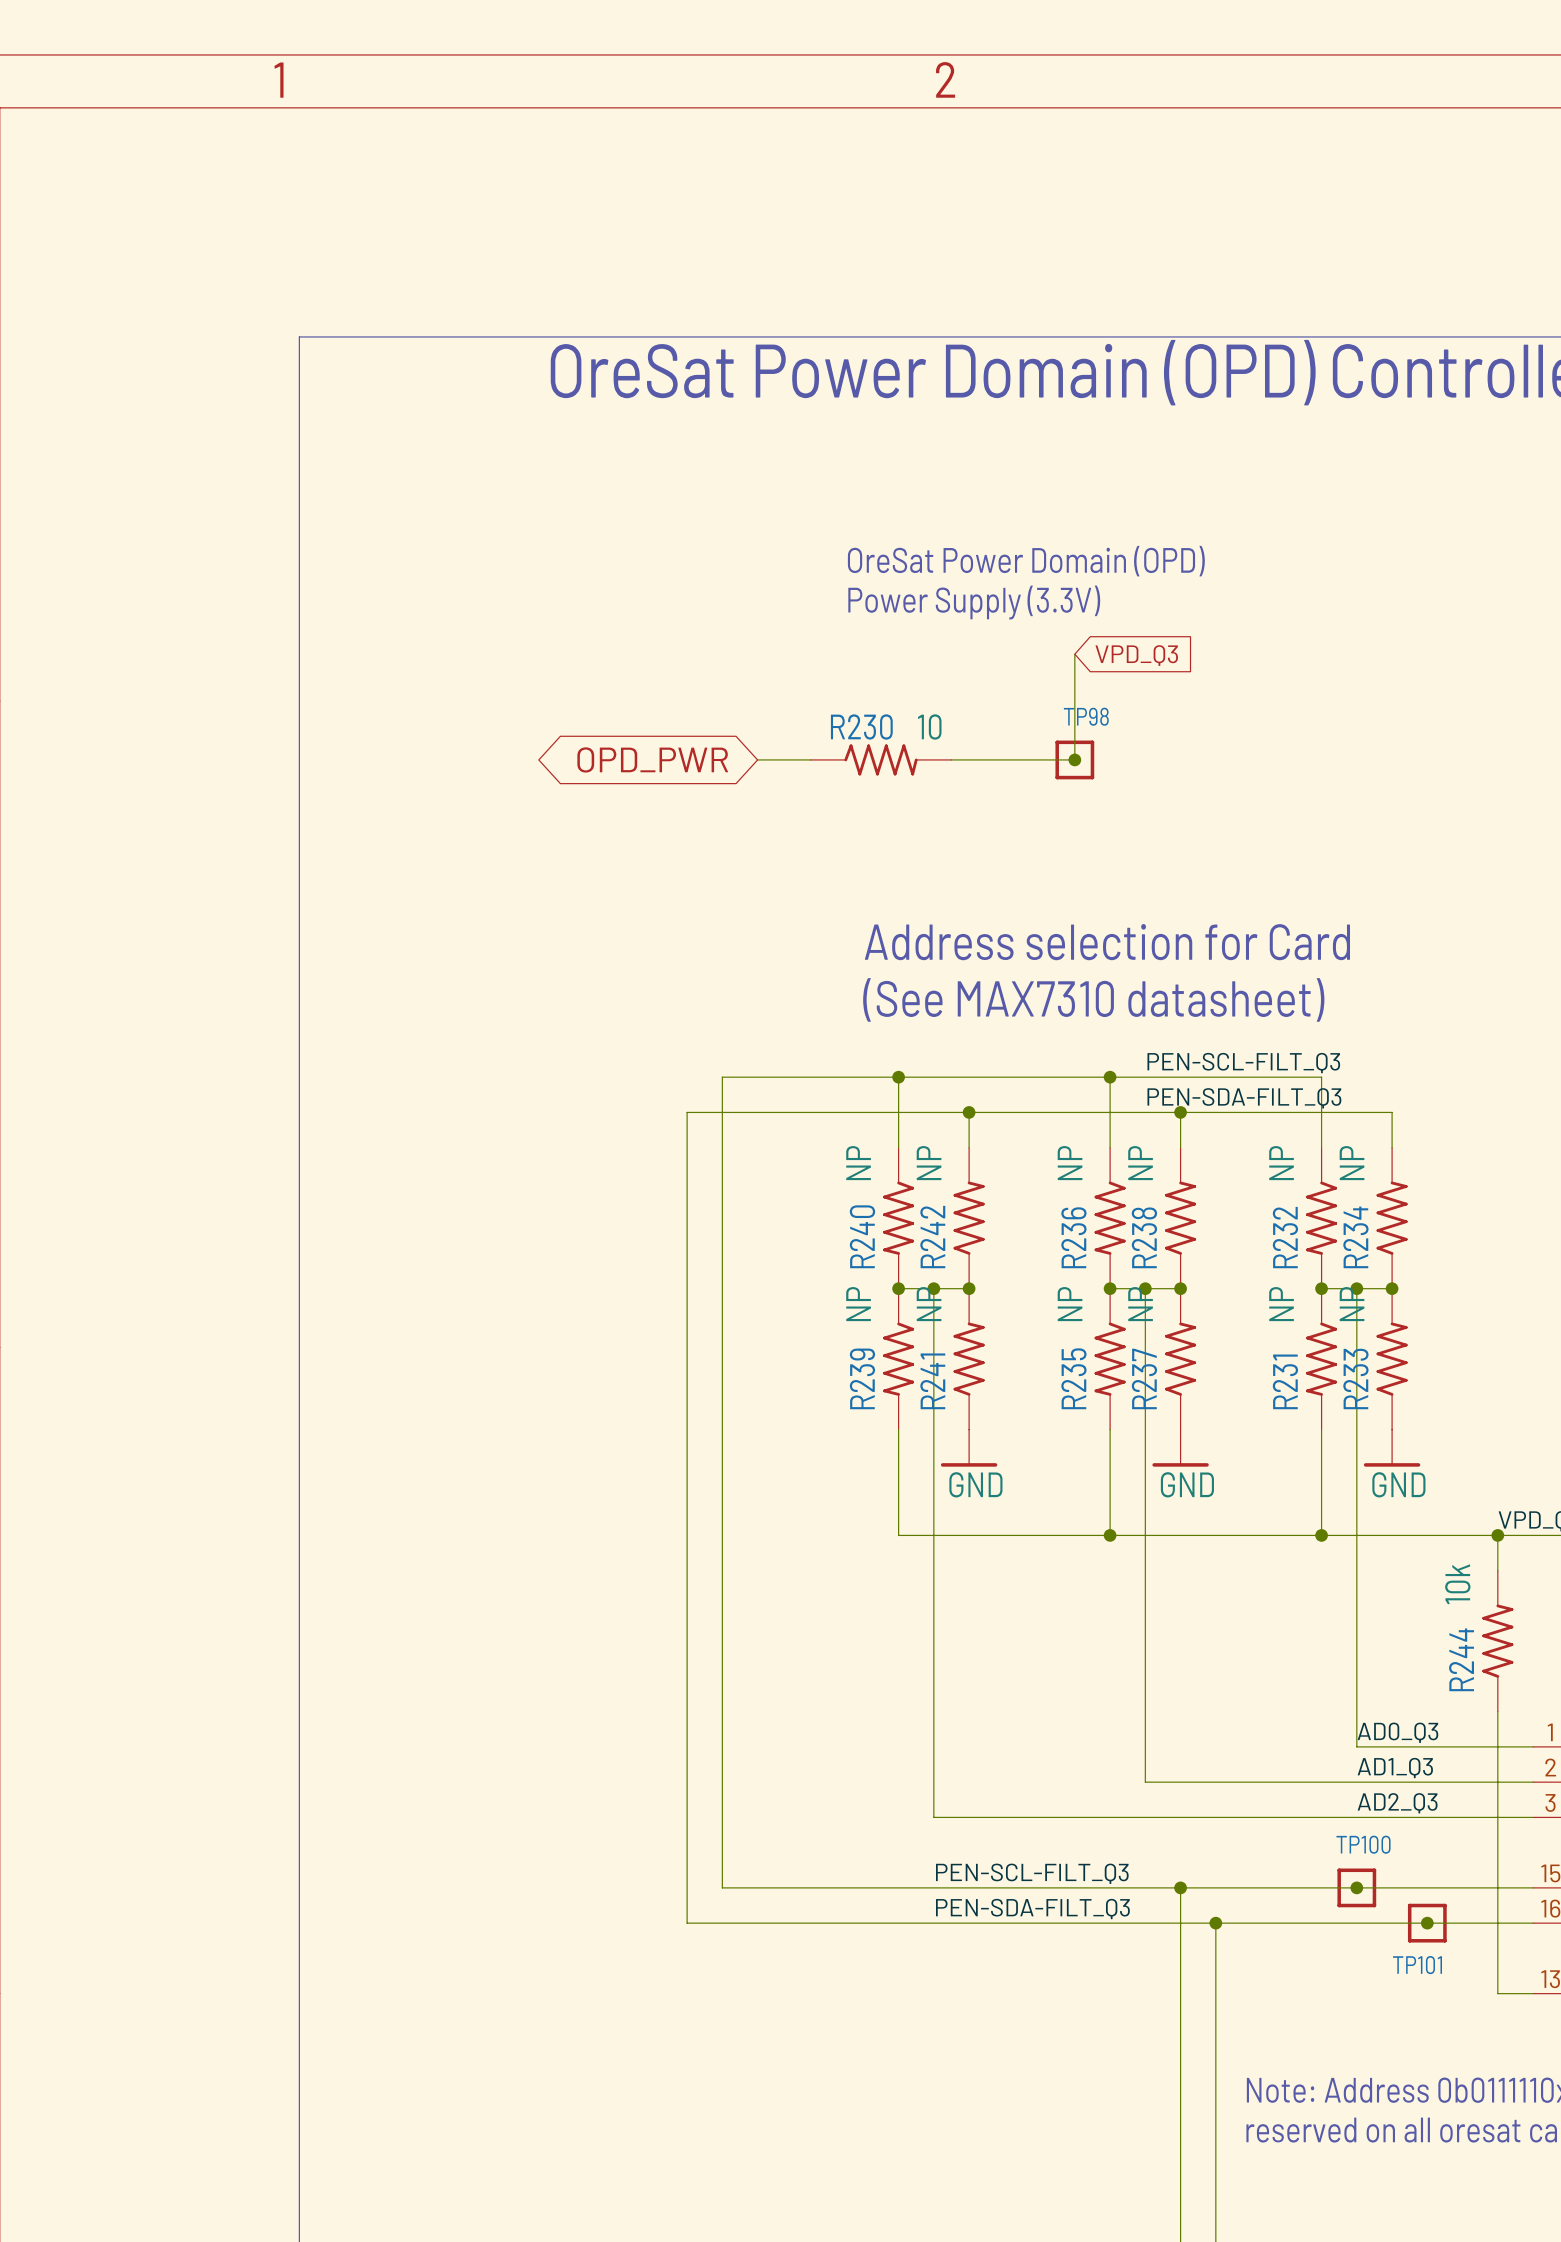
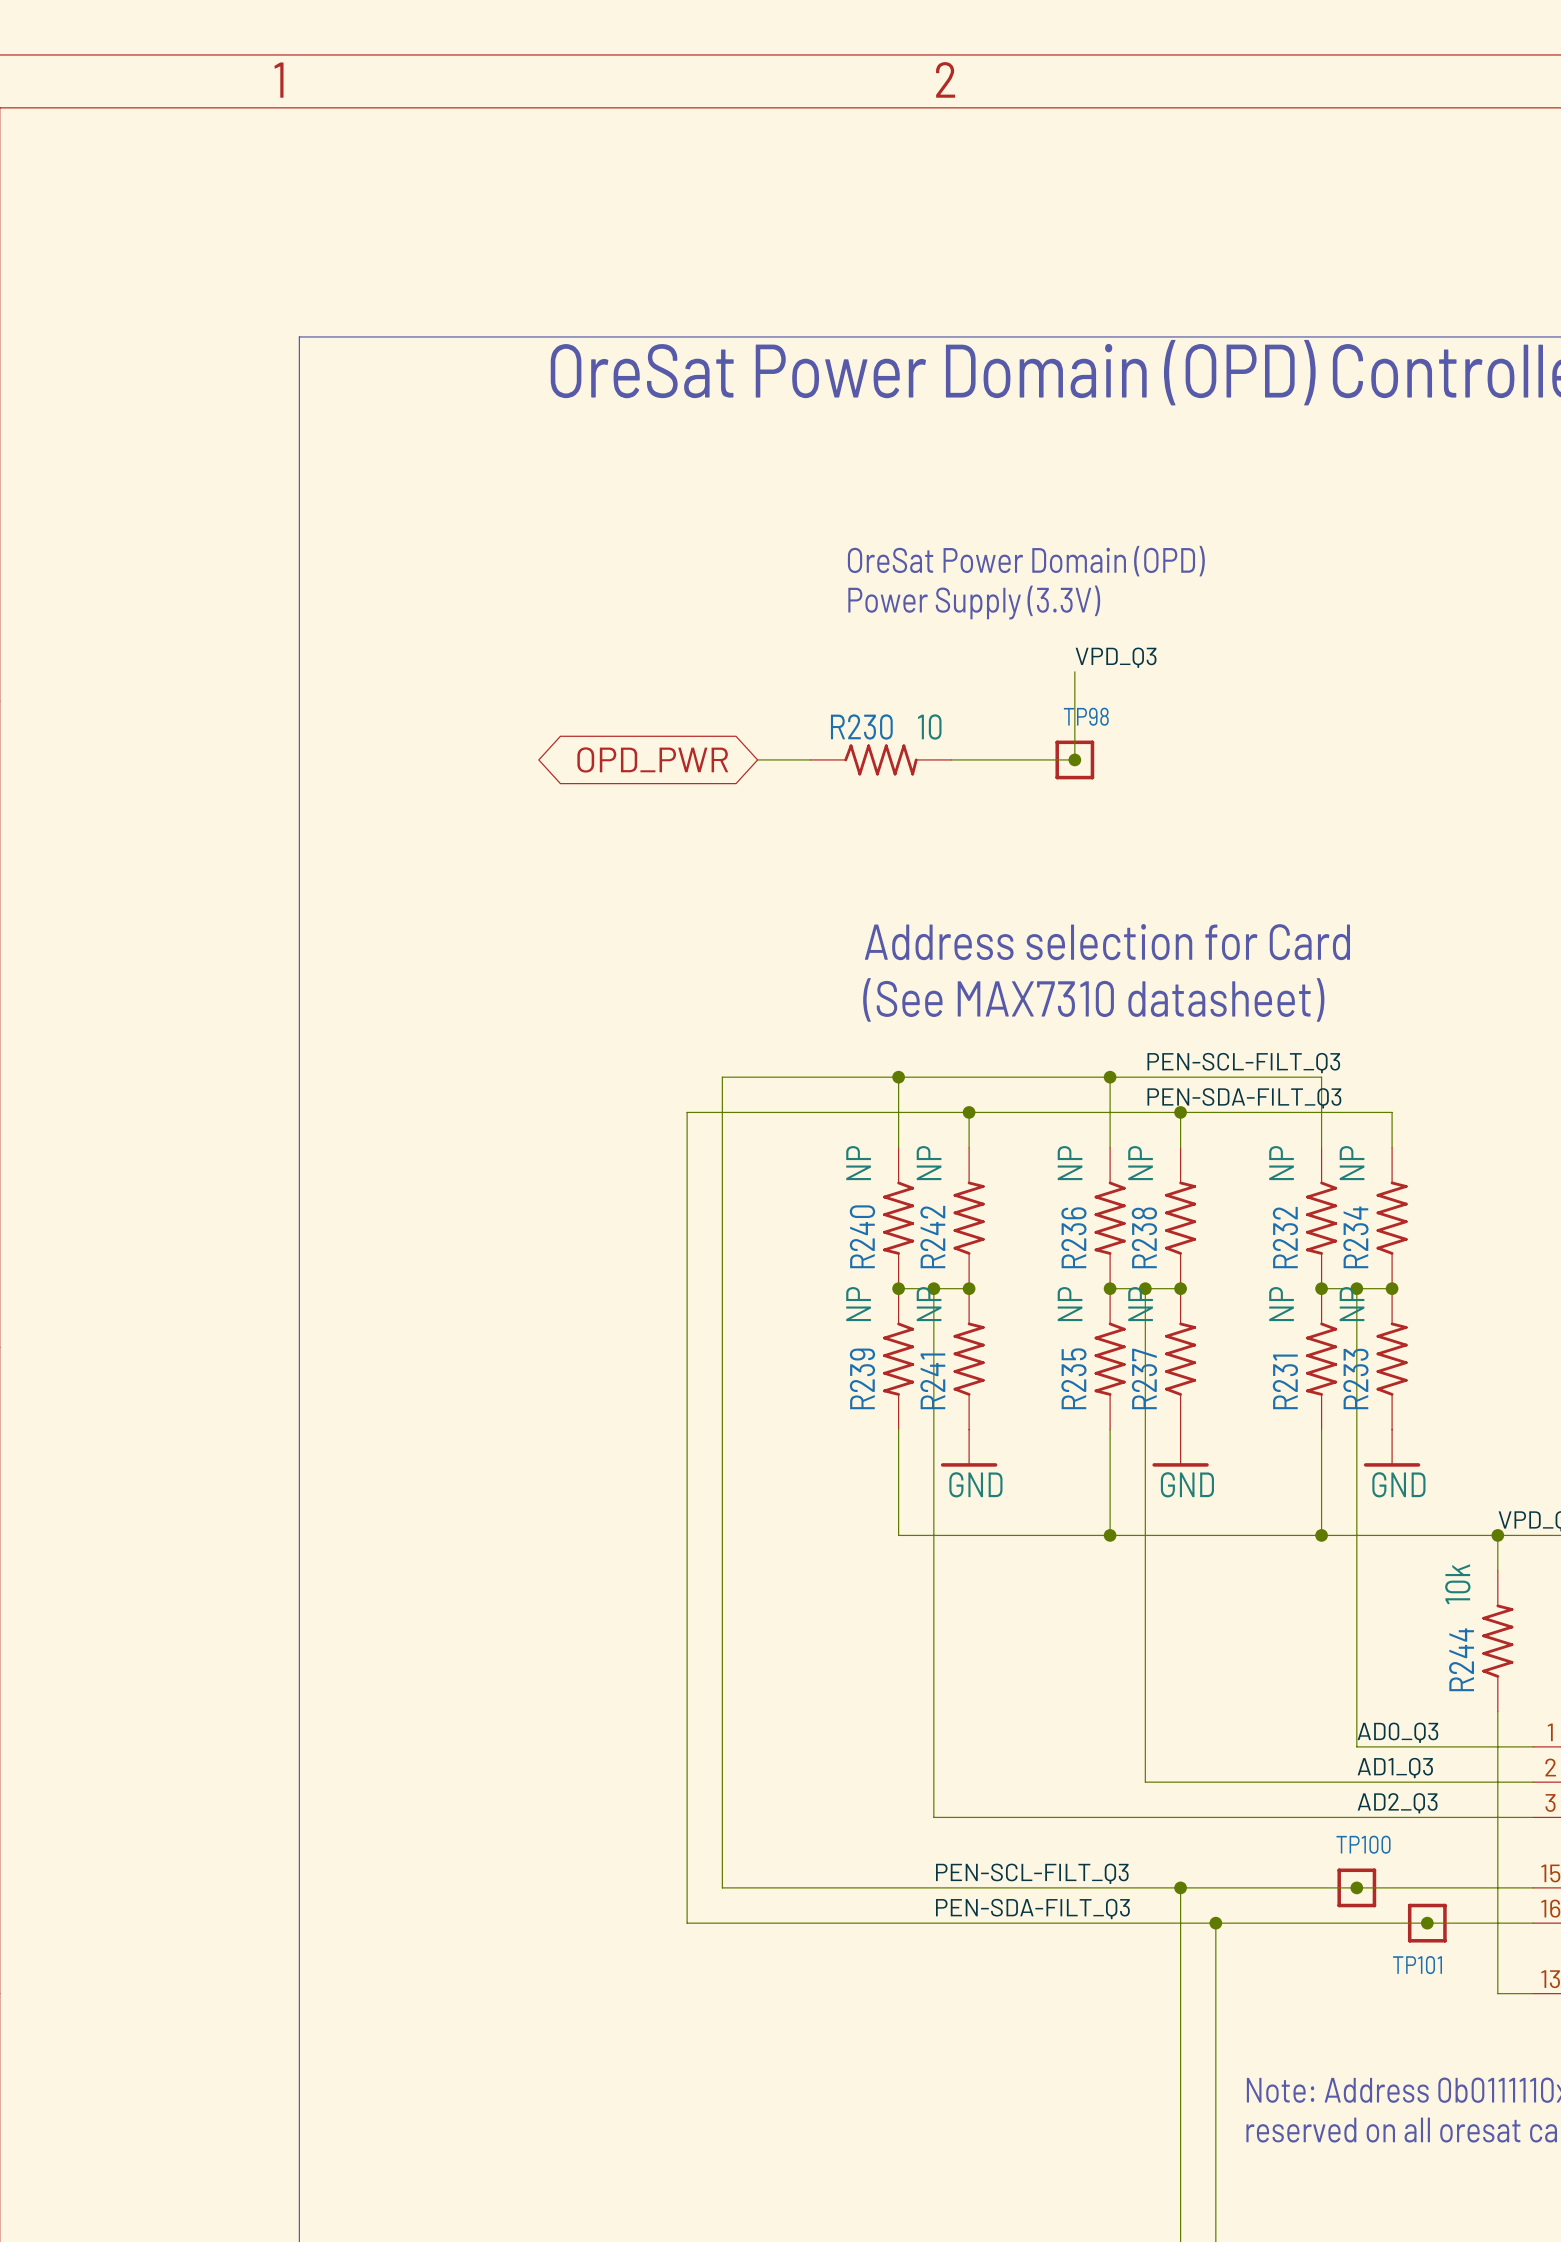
wire: (1074, 654) (1074, 671) -> none
global label: VPD_Q3 (1136, 655) -> none
label: none -> VPD_Q3 (1116, 657)

